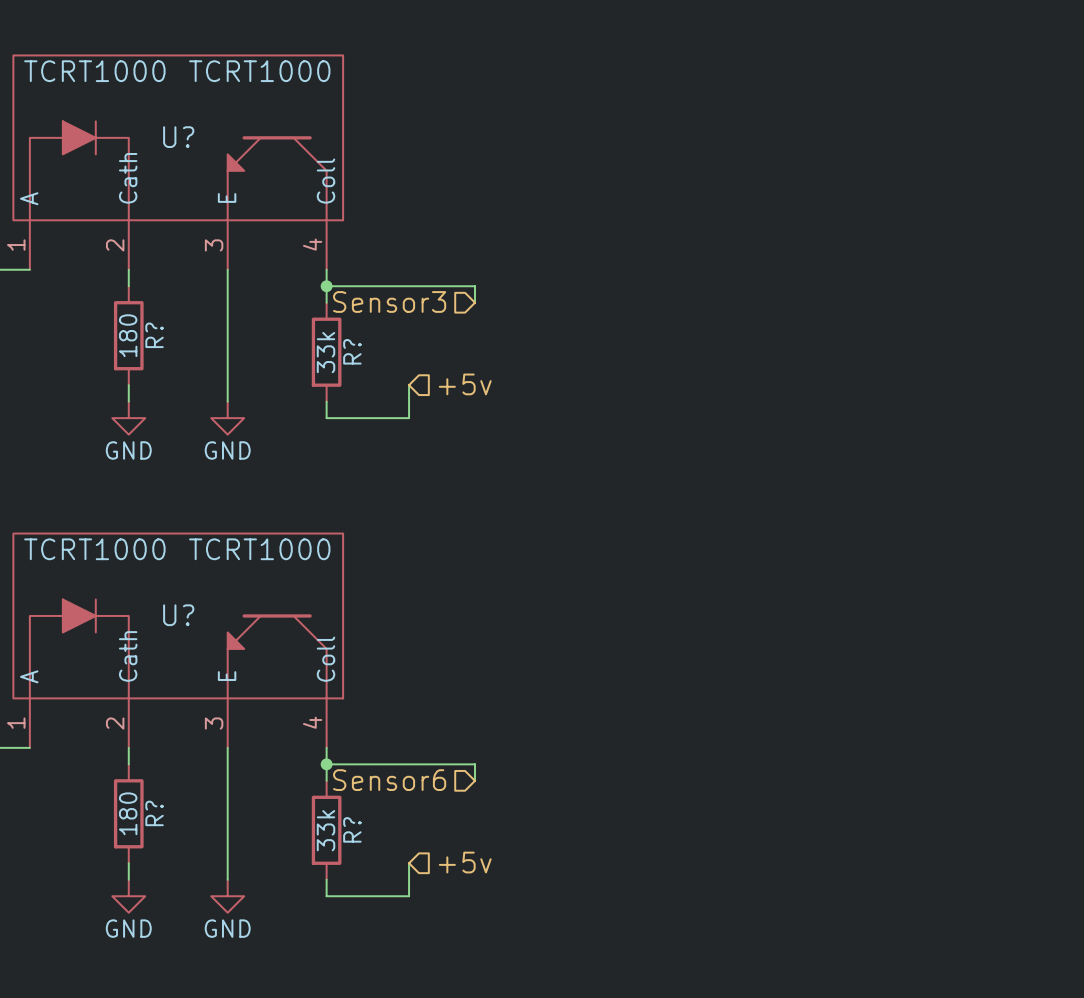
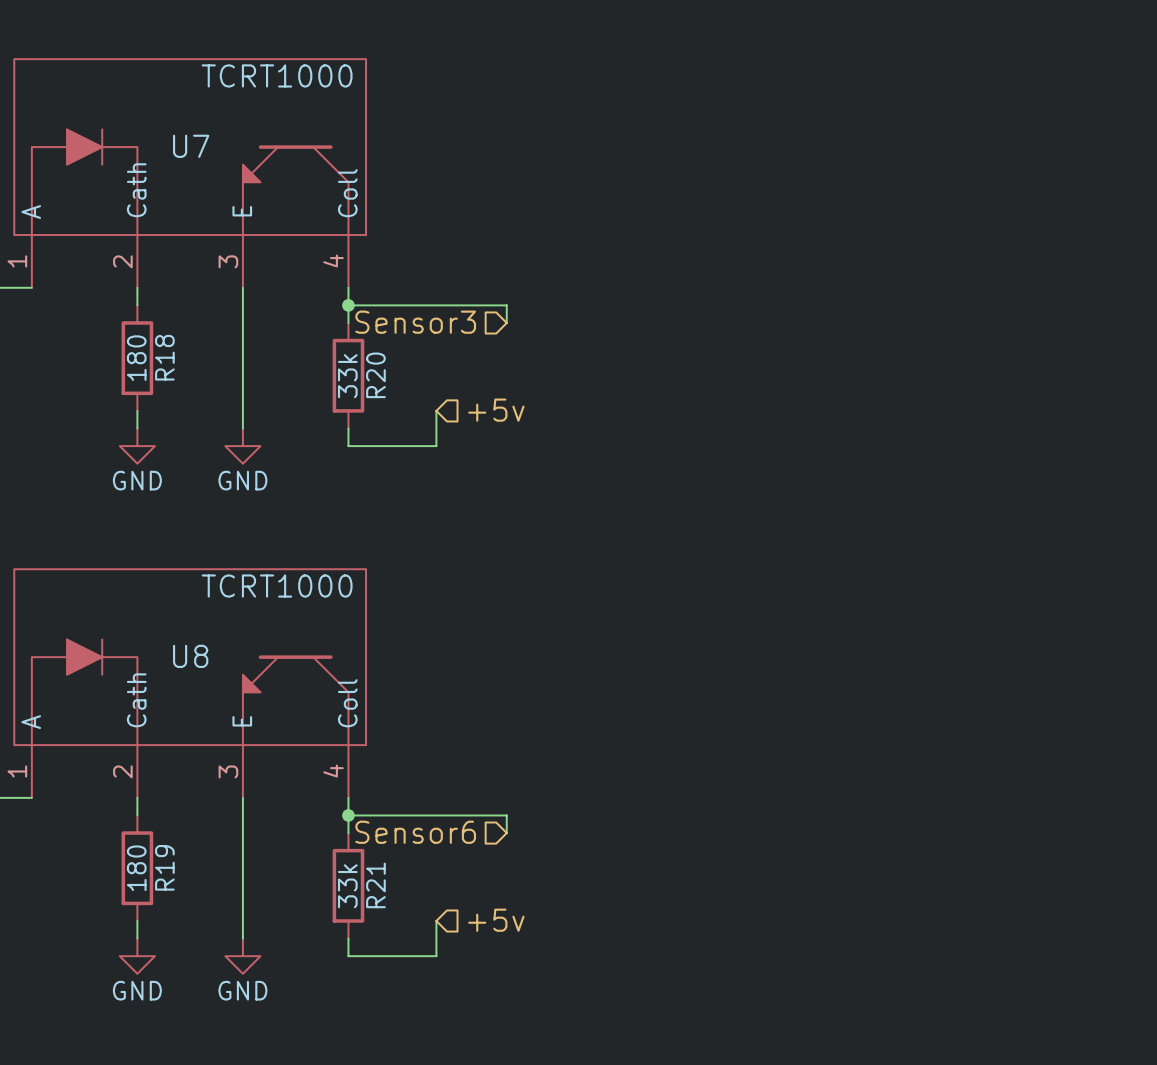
U? text: TCRT1000 (94, 71) -> none
U? name: U? (178, 137) -> U7 (191, 146)
R? name: R? (154, 335) -> R18 (164, 357)
R? name: R? (352, 351) -> R20 (375, 375)
U? text: TCRT1000 (94, 549) -> none
U? name: U? (178, 615) -> U8 (190, 656)
R? name: R? (154, 813) -> R19 (164, 867)
R? name: R? (352, 829) -> R21 (375, 885)

